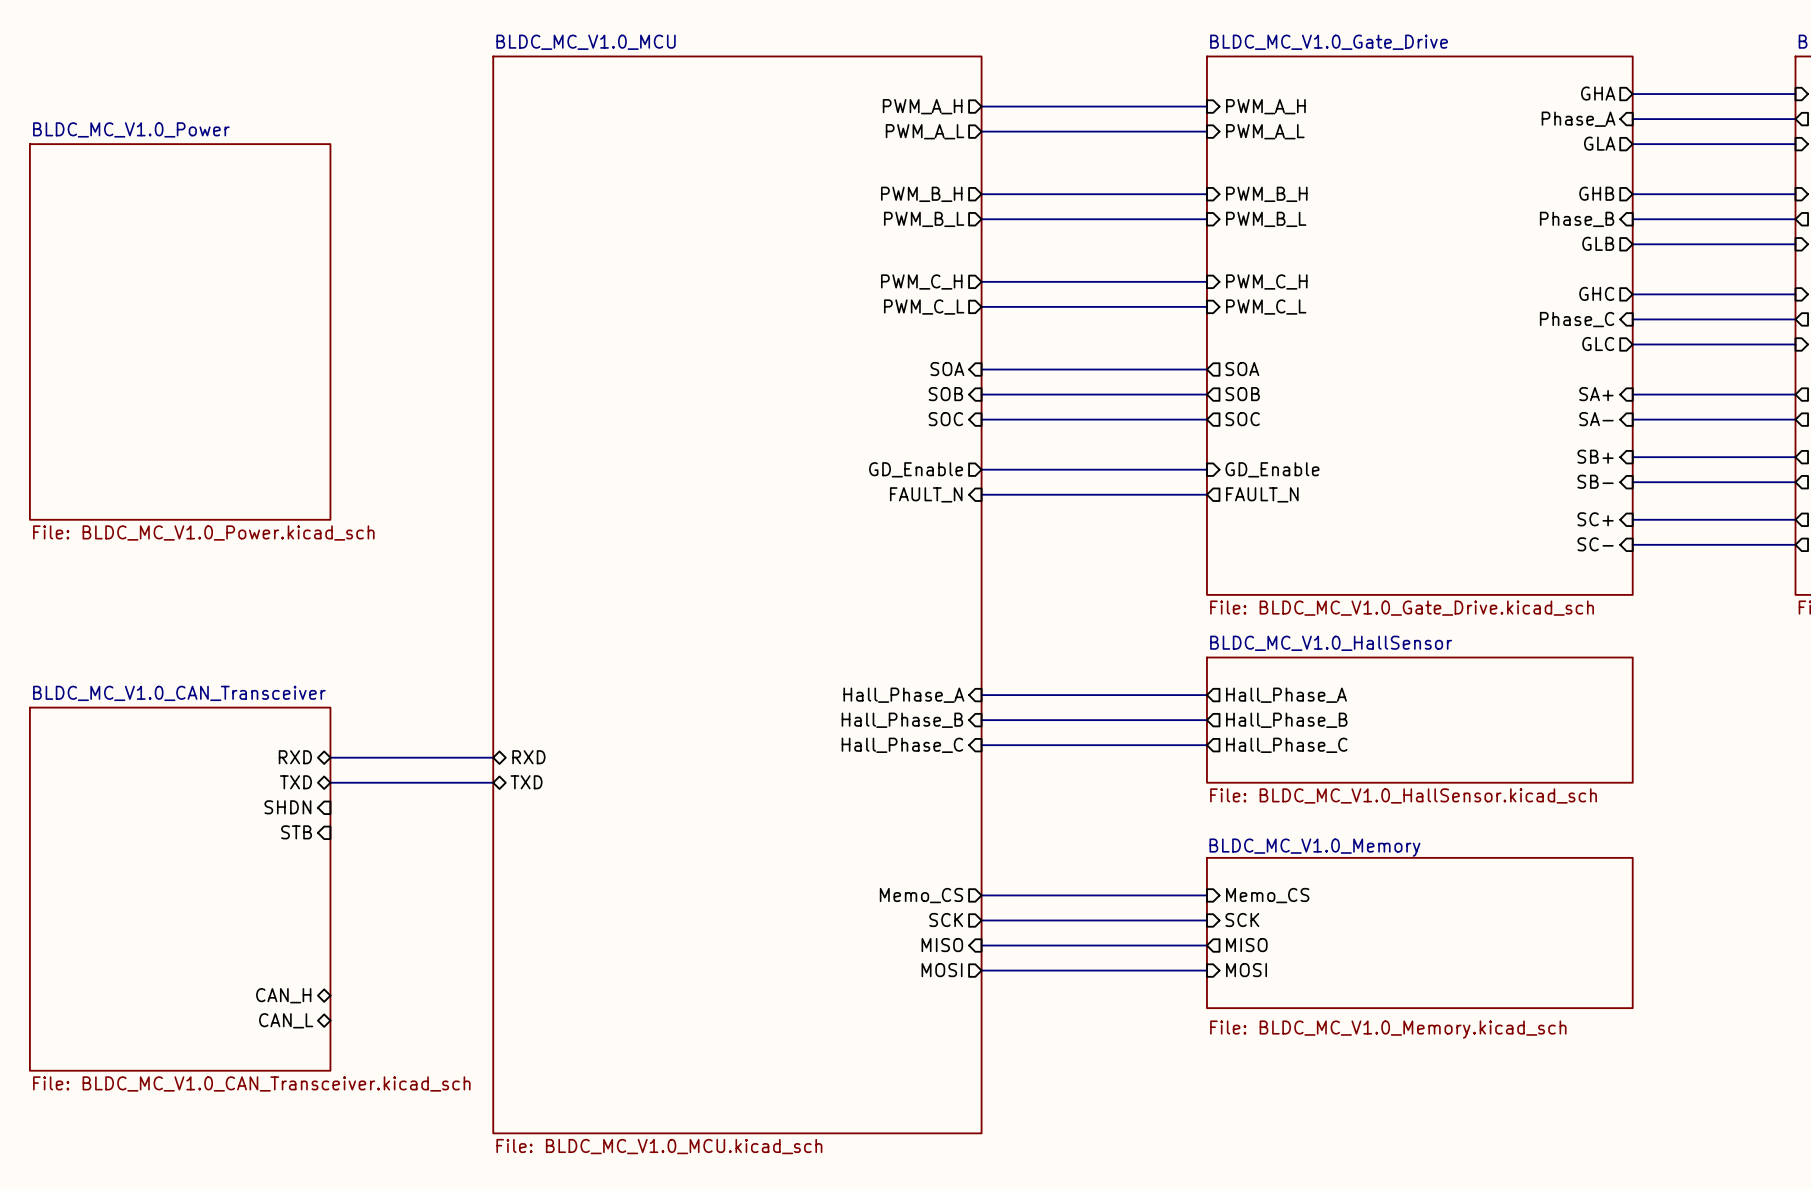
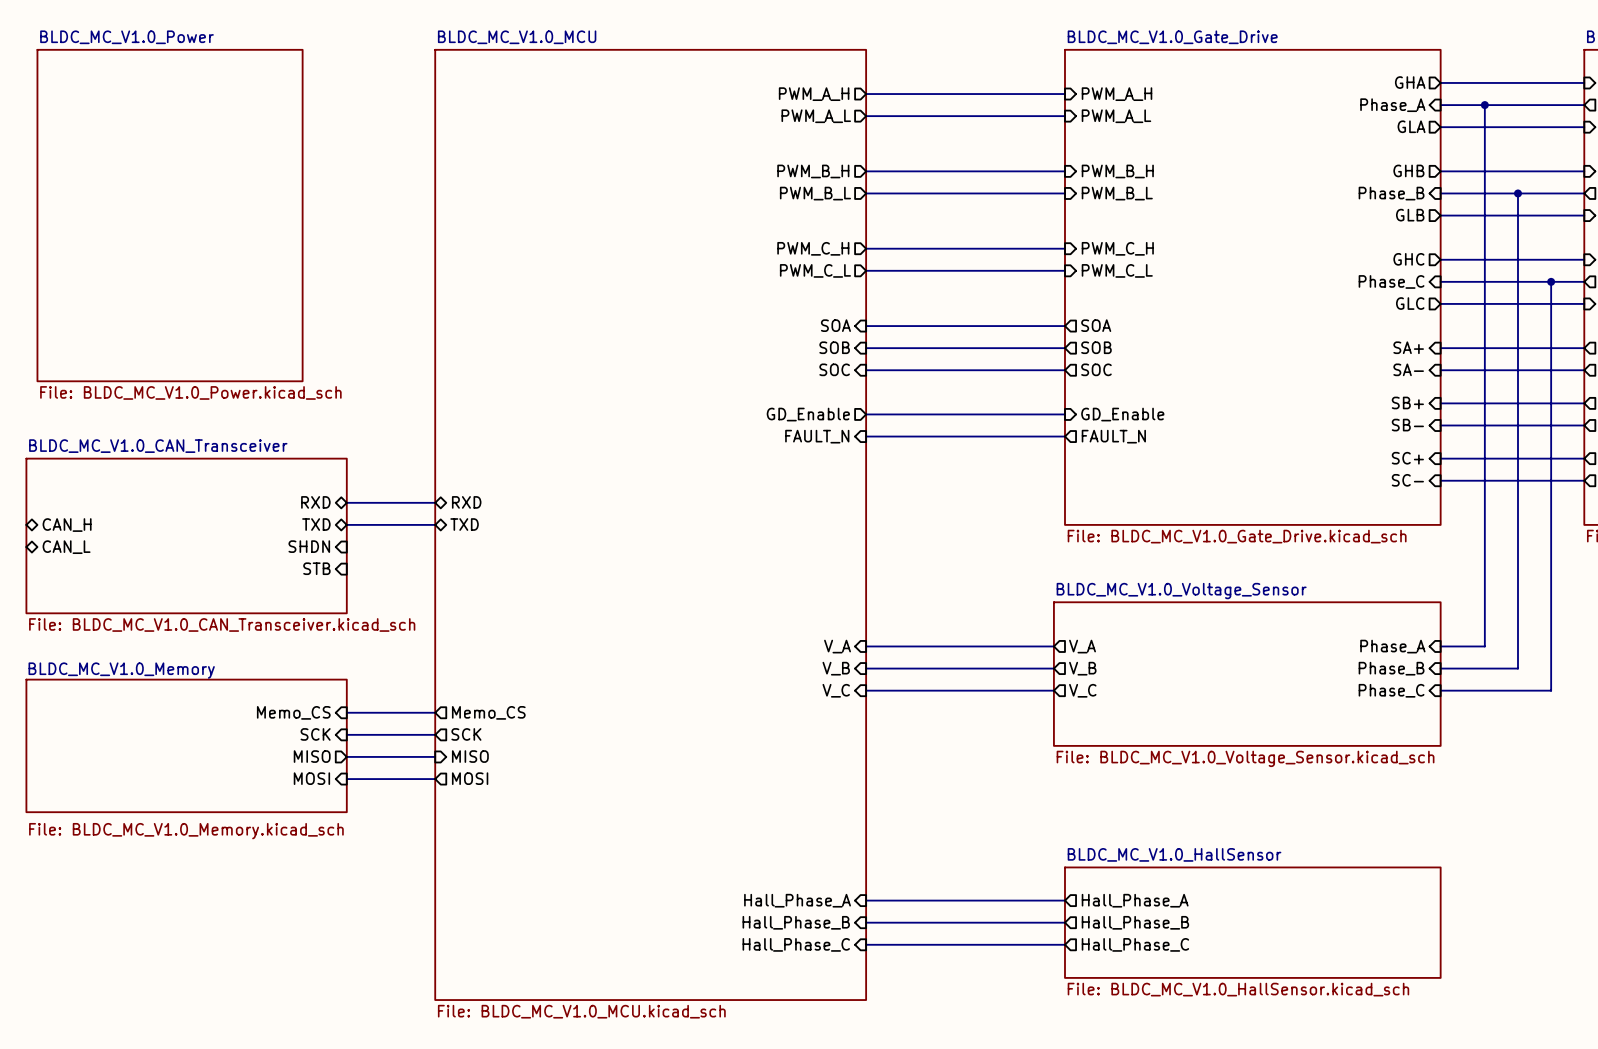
wire: none -> (1484, 105) (1484, 646) (1440, 646)
junction: none -> (1484, 105)
wire: none -> (1518, 193) (1518, 668) (1440, 668)
junction: none -> (1518, 193)
wire: none -> (1551, 281) (1551, 690) (1440, 690)
junction: none -> (1551, 281)
sheet BLDC_MC_V1.0_Power position: (180, 331) -> (170, 215)
sheet pin: none -> RXD (315, 502)
wire: none -> (346, 502) (435, 502)
sheet pin: none -> RXD (466, 502)
sheet pin: none -> TXD (316, 524)
wire: none -> (346, 524) (435, 524)
sheet pin: none -> TXD (464, 524)
sheet pin: none -> CAN_H (67, 525)
sheet pin: none -> CAN_L (66, 547)
sheet BLDC_MC_V1.0_CAN_Transceiver name position: BLDC_MC_V1.0_CAN_Transceiver (179, 693) -> BLDC_MC_V1.0_CAN_Transceiver (158, 446)
sheet pin: Hall_Phase_A (903, 695) -> none
wire: (981, 695) (1206, 695) -> none
sheet pin: Hall_Phase_A (1286, 695) -> none
sheet BLDC_MC_V1.0_CAN_Transceiver shape: [29, 706, 332, 1072] -> [25, 457, 348, 614]
sheet pin: Hall_Phase_B (902, 720) -> none
wire: (981, 720) (1206, 720) -> none
sheet pin: Hall_Phase_B (1286, 720) -> none
sheet BLDC_MC_V1.0_HallSensor position: (1419, 720) -> (1252, 922)
sheet pin: none -> V_A (837, 646)
wire: none -> (866, 646) (1053, 646)
sheet pin: none -> V_A (1082, 646)
sheet pin: none -> Phase_A (1392, 646)
sheet pin: Hall_Phase_C (902, 745) -> none
wire: (981, 745) (1206, 745) -> none
sheet pin: Hall_Phase_C (1286, 745) -> none
sheet pin: RXD (295, 757) -> none
wire: (330, 757) (493, 757) -> none
sheet pin: RXD (528, 757) -> none
sheet pin: none -> V_B (836, 668)
wire: none -> (866, 668) (1053, 668)
sheet pin: none -> V_B (1082, 668)
sheet pin: none -> Phase_B (1391, 668)
sheet BLDC_MC_V1.0_Voltage_Sensor: none -> File: BLDC_MC_V1.0_Voltage_Sensor.kicad_sch (1247, 674)
sheet pin: TXD (295, 782) -> none
wire: (330, 782) (493, 782) -> none
sheet pin: TXD (526, 782) -> none
sheet pin: none -> V_C (836, 690)
wire: none -> (866, 690) (1053, 690)
sheet pin: none -> V_C (1082, 690)
sheet pin: none -> Phase_C (1391, 690)
sheet pin position: SHDN (287, 807) -> SHDN (309, 546)
sheet pin: none -> Memo_CS (293, 712)
wire: none -> (346, 712) (435, 712)
sheet pin: none -> Memo_CS (488, 712)
sheet pin position: STB (296, 832) -> STB (316, 568)
sheet pin: none -> SCK (315, 734)
wire: none -> (346, 734) (435, 734)
sheet pin: none -> SCK (466, 734)
sheet BLDC_MC_V1.0_Memory name position: BLDC_MC_V1.0_Memory (1314, 847) -> BLDC_MC_V1.0_Memory (121, 670)
sheet pin: none -> MISO (312, 756)
wire: none -> (346, 756) (435, 756)
sheet pin: none -> MISO (470, 756)
sheet BLDC_MC_V1.0_Memory shape: [1206, 857, 1634, 1009] -> [25, 678, 348, 813]
sheet pin: none -> MOSI (311, 778)
wire: none -> (346, 779) (435, 779)
sheet pin: none -> MOSI (470, 778)
sheet pin: Memo_CS (921, 895) -> none
wire: (981, 895) (1206, 895) -> none
sheet pin: Memo_CS (1267, 895) -> none
sheet pin: SCK (946, 920) -> none
wire: (981, 920) (1206, 920) -> (866, 900) (1064, 900)
sheet pin: SCK (1242, 920) -> none
sheet pin: MISO (942, 945) -> none
wire: (981, 945) (1206, 945) -> (866, 922) (1064, 922)
sheet pin: MISO (1246, 945) -> none
sheet pin: MOSI (942, 970) -> none
wire: (981, 970) (1206, 970) -> (866, 944) (1064, 944)
sheet pin: MOSI (1246, 970) -> none
sheet pin: CAN_H (283, 995) -> none
sheet pin: CAN_L (286, 1020) -> none
sheet pin: none -> Hall_Phase_A (797, 900)
sheet pin: none -> Hall_Phase_A (1135, 900)
sheet BLDC_MC_V1.0_Memory value position: File: BLDC_MC_V1.0_Memory.kicad_sch (1388, 1029) -> File: BLDC_MC_V1.0_Memory.kicad_sch (186, 831)
sheet pin: none -> Hall_Phase_B (796, 922)
sheet pin: none -> Hall_Phase_B (1135, 922)
sheet pin: none -> Hall_Phase_C (796, 944)
sheet pin: none -> Hall_Phase_C (1135, 944)
sheet BLDC_MC_V1.0_CAN_Transceiver value position: File: BLDC_MC_V1.0_CAN_Transceiver.kicad_sch (251, 1083) -> File: BLDC_MC_V1.0_CAN_Transceiver.kicad_sch (222, 624)

